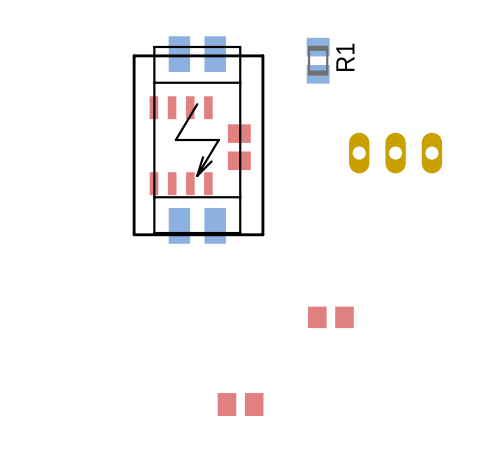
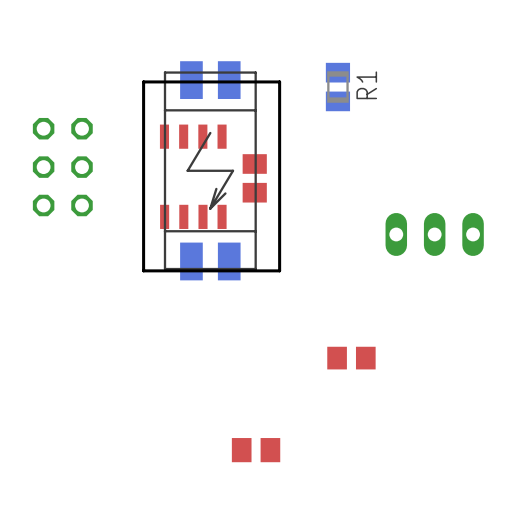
part: none -> (62, 167)
part position: (395, 153) -> (434, 234)

